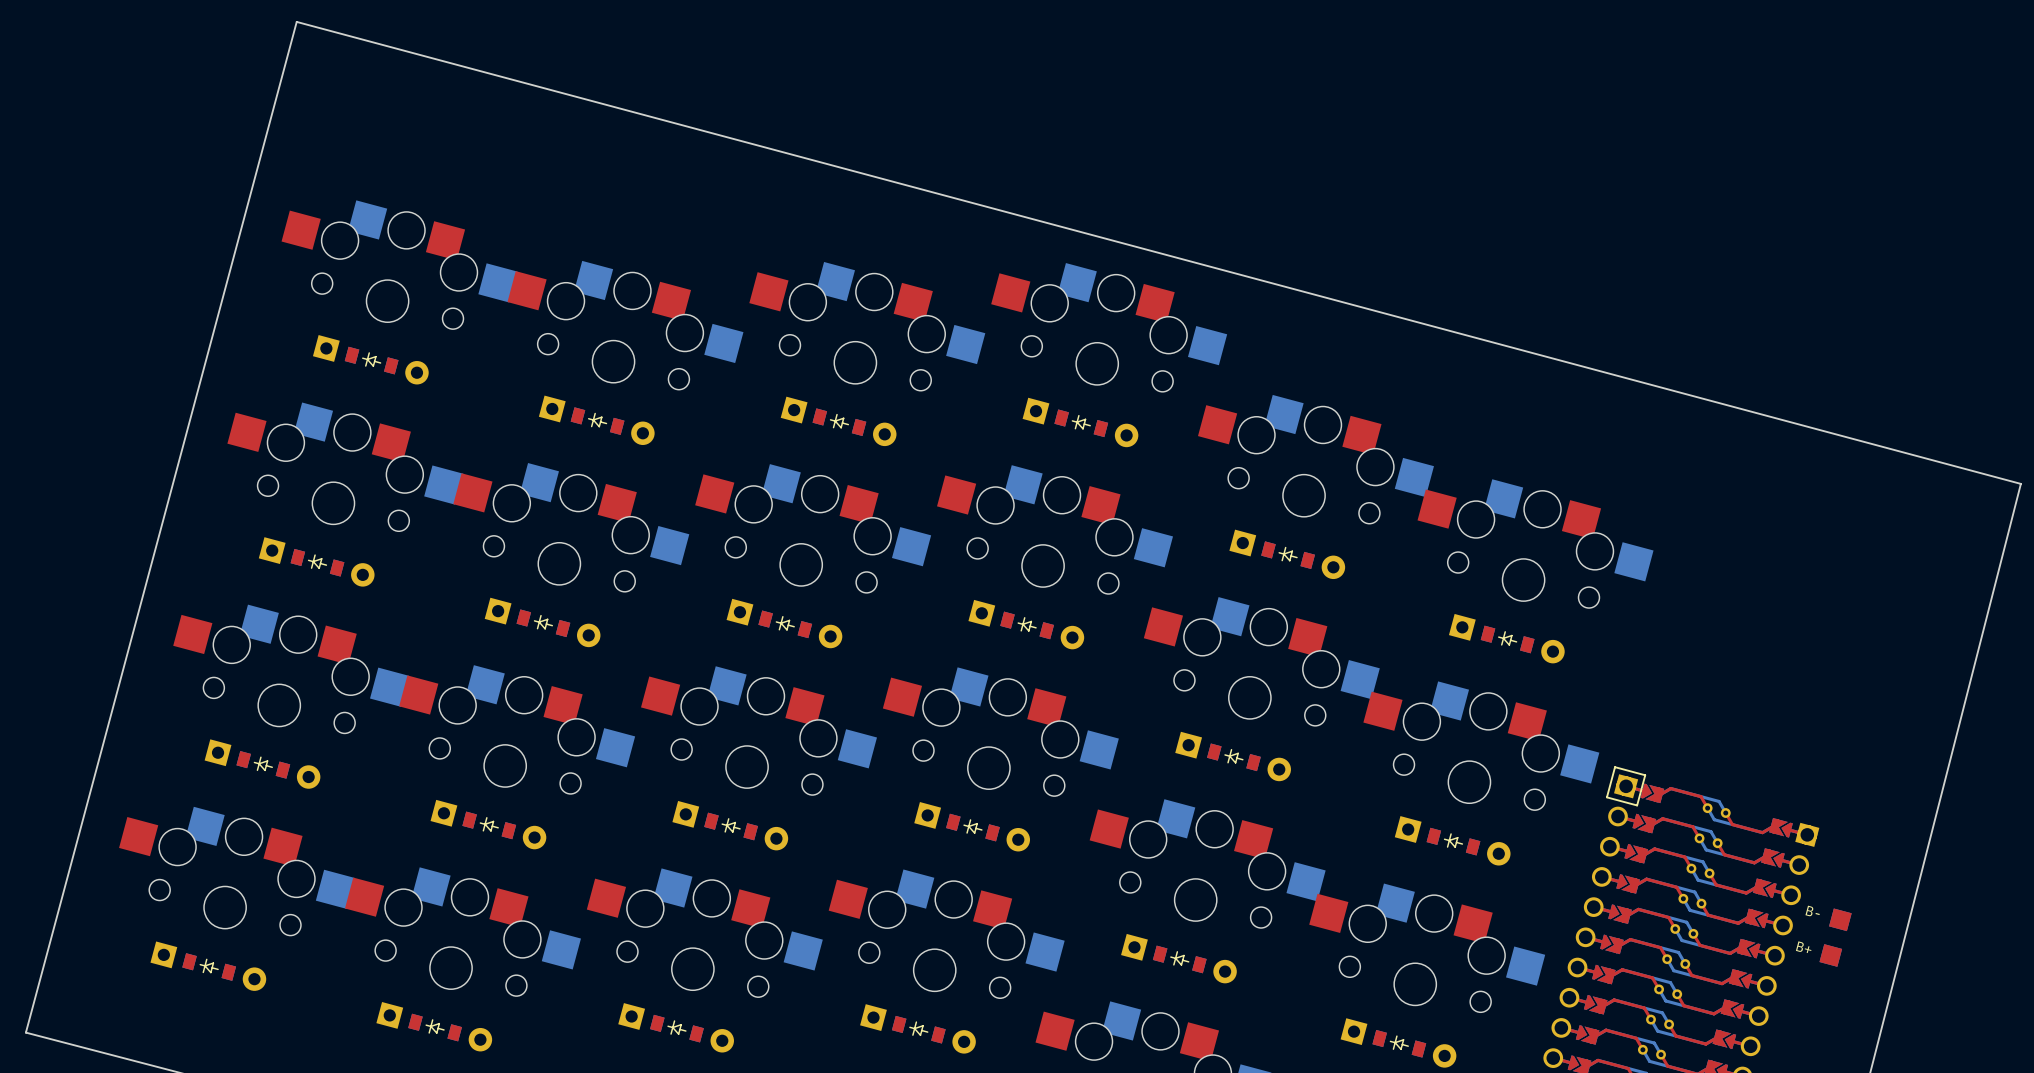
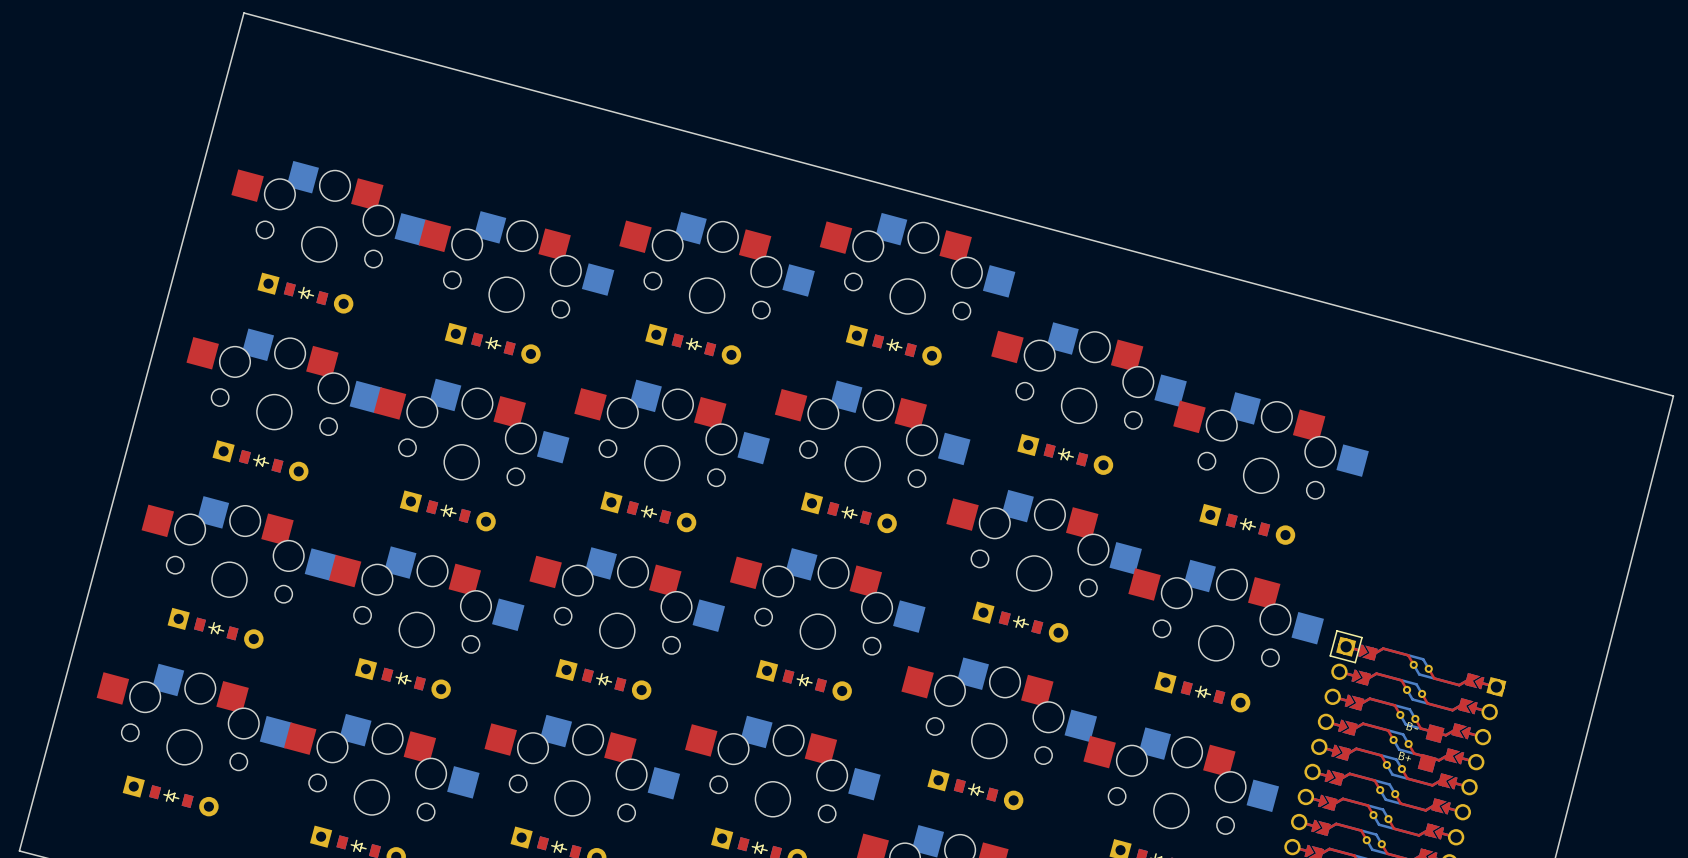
part position: (1840, 919) -> (1435, 733)
part position: (1830, 955) -> (1427, 763)

